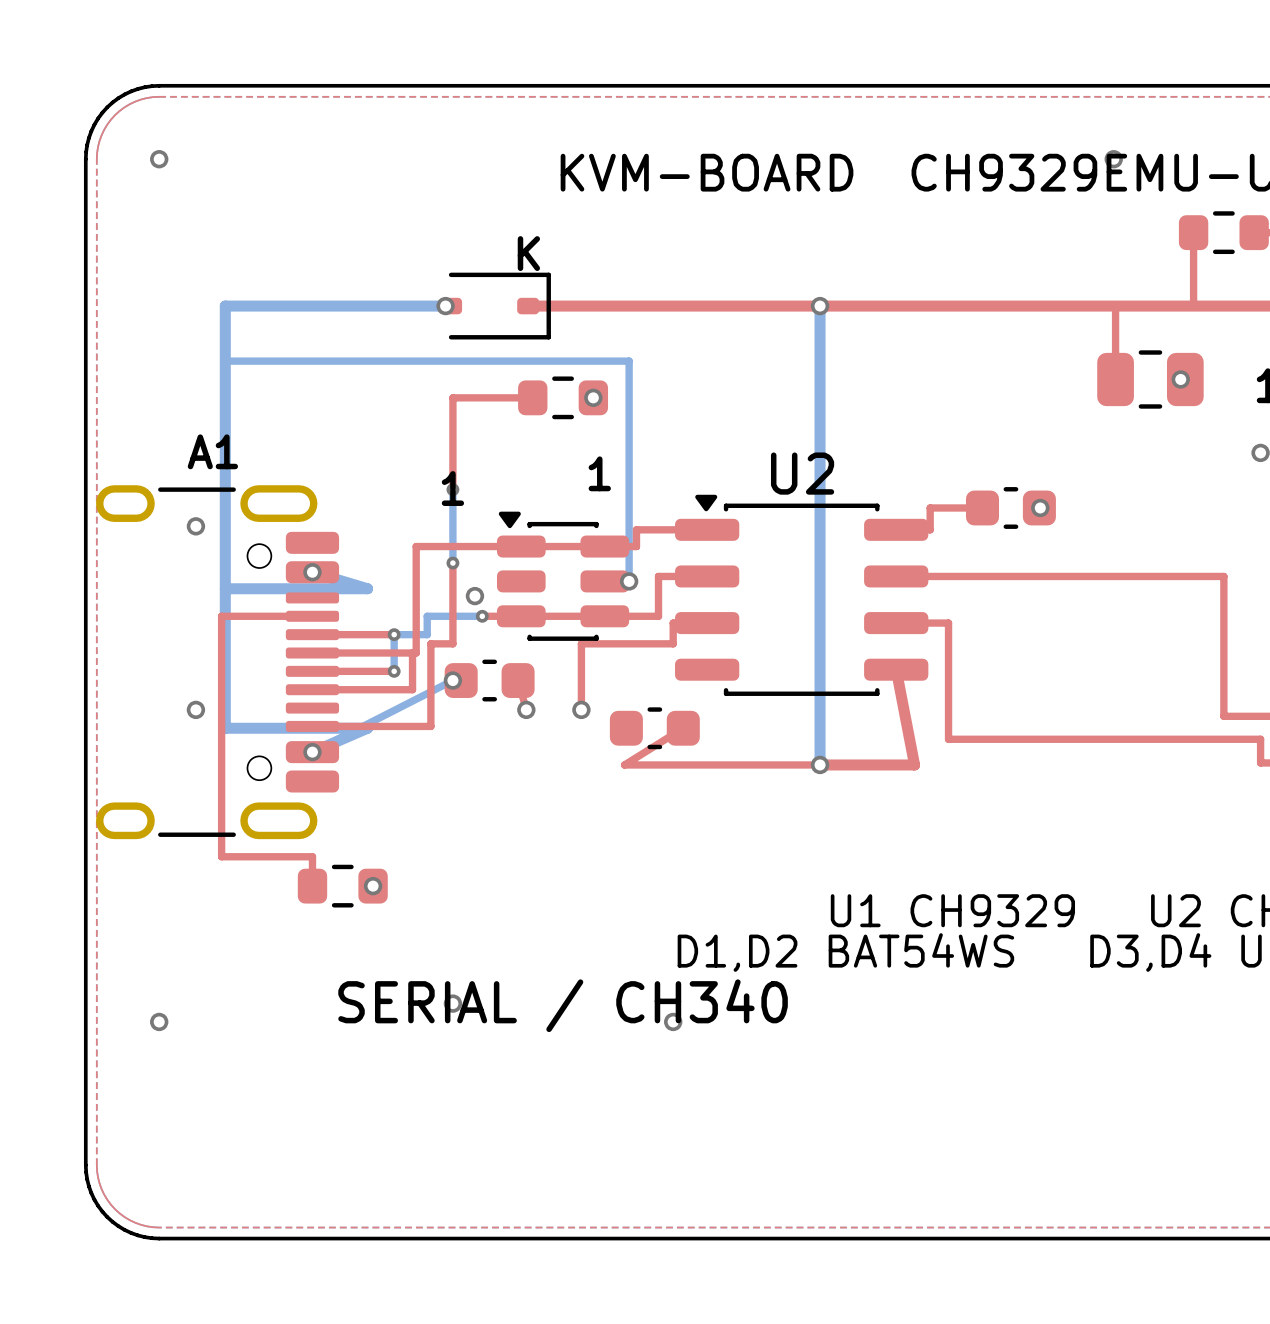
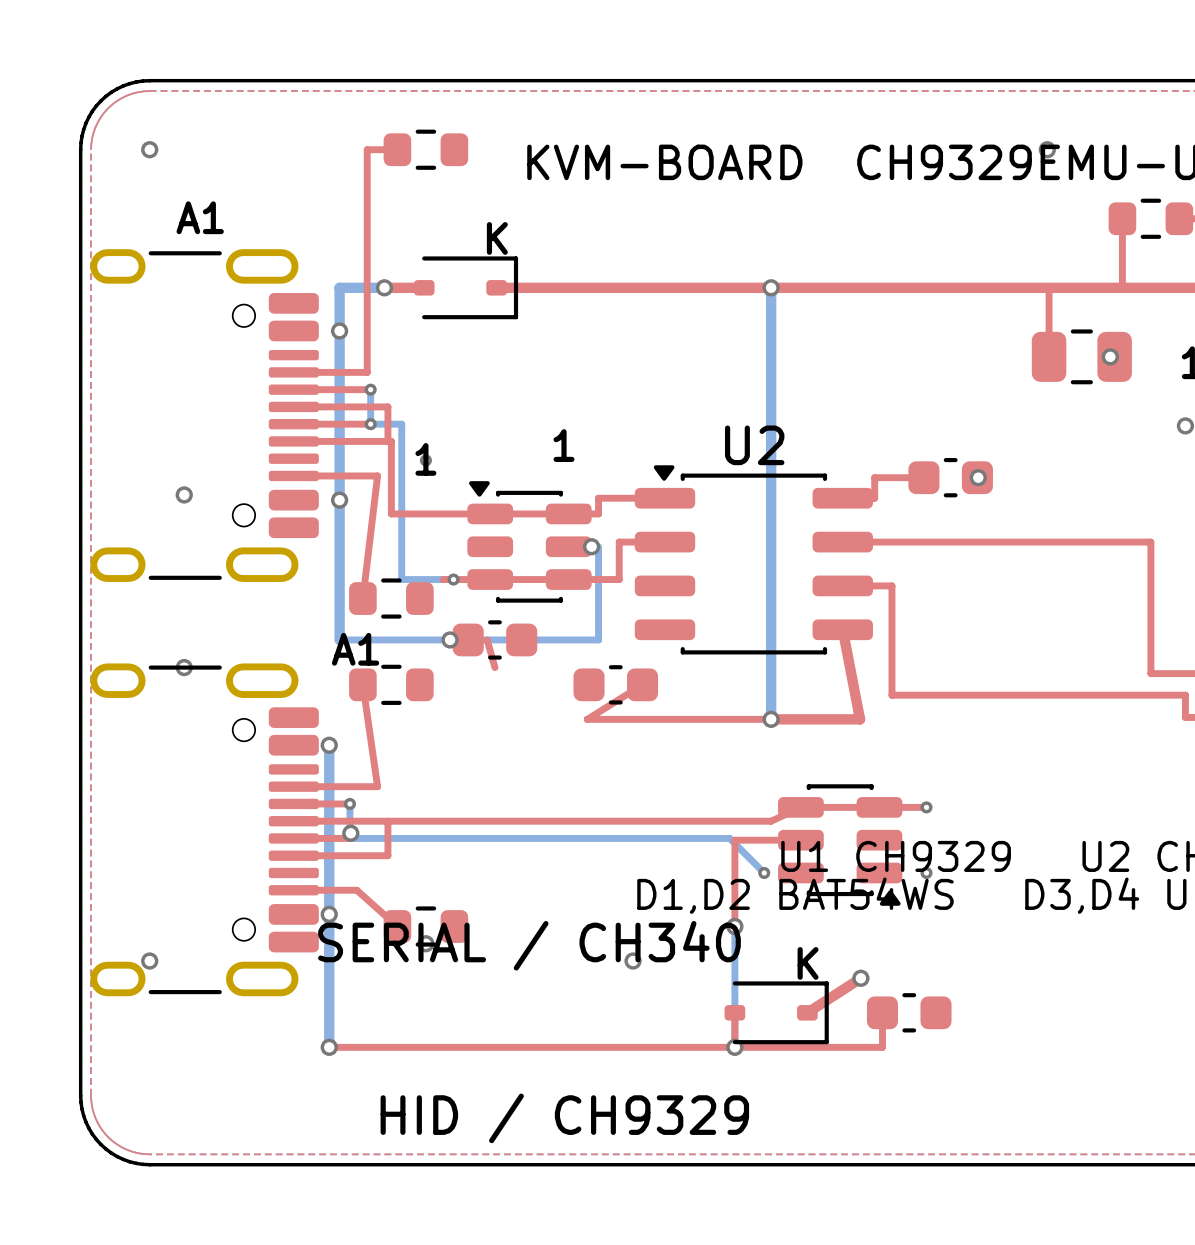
top track: none -> (397, 149) (367, 149) (367, 372) (293, 372)
part: none -> (425, 149)
text: none -> A1 (200, 217)
bottom track: (361, 306) (225, 306) (225, 728) (367, 728) (312, 752) (452, 680) -> (339, 287) (339, 639) (598, 639) (598, 546)
top track: none -> (384, 287) (419, 287)
bottom track: (408, 306) (445, 306) -> none
via position: (445, 306) -> (384, 287)
via: none -> (339, 330)
bottom track: (225, 361) (629, 361) (629, 581) -> none
top track: (532, 397) (452, 397) (452, 489) -> none
part: (563, 397) -> none
via: (593, 397) -> none
via: none -> (370, 389)
top track: none -> (293, 406) (387, 406) (387, 441)
part: none -> (204, 415)
text: A1 (212, 451) -> none
via: none -> (370, 424)
bottom track: (452, 489) (452, 563) -> none
top track: none -> (293, 475) (377, 475) (362, 598)
top track: (416, 546) (416, 653) (312, 653) -> (391, 513) (391, 441) (293, 441)
top track: (452, 563) (452, 643) (430, 643) (430, 726) (312, 726) -> none
via: (452, 563) -> none
bottom track: (312, 572) (367, 588) (225, 588) -> none
via position: (312, 572) -> (339, 500)
via: (474, 596) -> none
top track: (312, 616) (221, 616) (221, 856) (312, 856) (312, 886) -> none
bottom track: (427, 616) (427, 634) (394, 634) (394, 671) -> (401, 579) (401, 424) (370, 424) (370, 389)
top track: none -> (443, 579) (453, 579)
top track: (707, 623) (673, 623) (673, 643) (581, 643) (581, 709) -> none
top track: (312, 634) (394, 634) -> (293, 389) (370, 389)
via: (394, 634) -> none
part: none -> (391, 598)
top track: (412, 653) (412, 689) (312, 689) -> (387, 821) (387, 855) (293, 855)
part: (217, 662) -> none
top track: (312, 671) (394, 671) -> (293, 424) (370, 424)
via: (394, 671) -> none
via position: (452, 680) -> (450, 639)
part position: (489, 680) -> (494, 639)
text: none -> A1 (355, 649)
via: (526, 709) -> none
via: (581, 709) -> none
top track: none -> (362, 684) (377, 786) (293, 786)
part: none -> (391, 684)
via position: (312, 752) -> (329, 745)
bottom track: none -> (329, 745) (329, 1047)
top track: none -> (293, 803) (349, 803)
bottom track: none -> (349, 803) (349, 838) (729, 838) (764, 872)
via: none -> (349, 803)
top track: none -> (926, 807) (800, 807) (771, 821) (293, 821)
via: none -> (926, 807)
part: none -> (204, 829)
part: (342, 886) -> none
top track: none -> (293, 838) (349, 838)
top track: none -> (800, 840) (734, 840) (734, 926)
part: none -> (840, 845)
via: none -> (764, 872)
via: none -> (926, 872)
top track: none -> (293, 890) (356, 890) (397, 926)
via: none -> (329, 914)
part: none -> (425, 926)
bottom track: none -> (734, 926) (734, 1047)
via: none -> (734, 926)
text: none -> K (808, 963)
top track: none -> (860, 978) (807, 1012)
via: none -> (860, 978)
top track: none -> (734, 1012) (734, 1047)
part: none -> (776, 1012)
top track: none -> (882, 1012) (882, 1047) (329, 1047)
part: none -> (909, 1012)
via: none -> (329, 1047)
via: none -> (734, 1047)
text: none -> HID / CH9329 (564, 1118)

